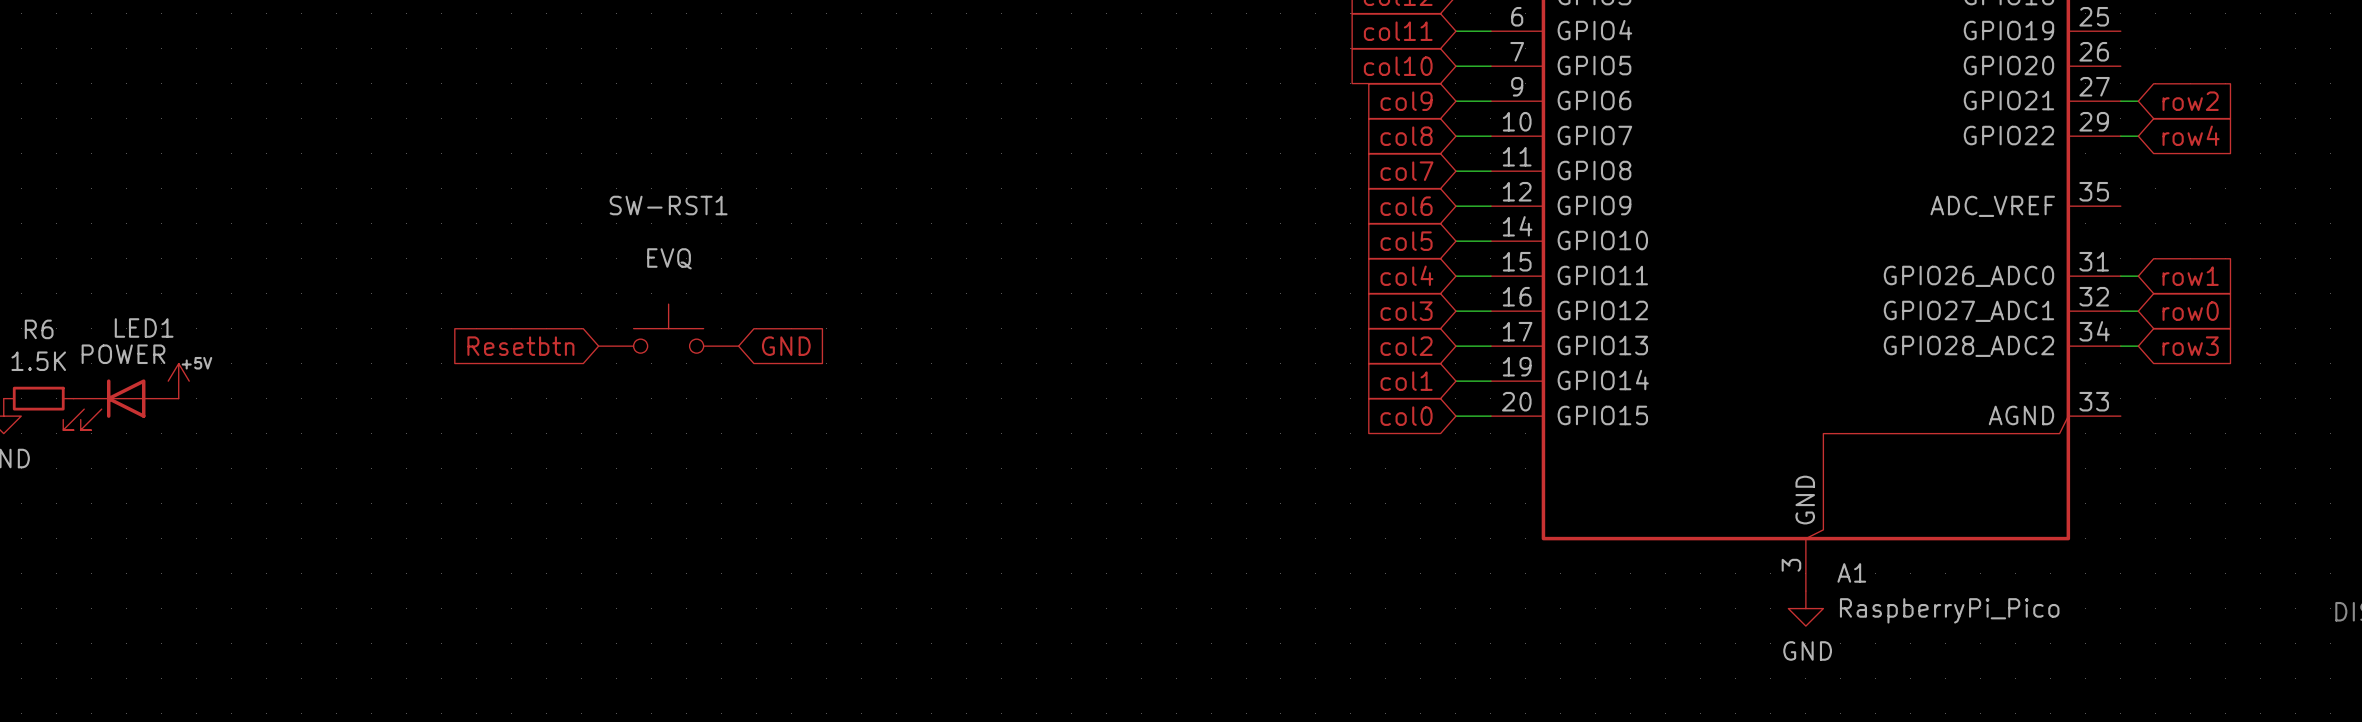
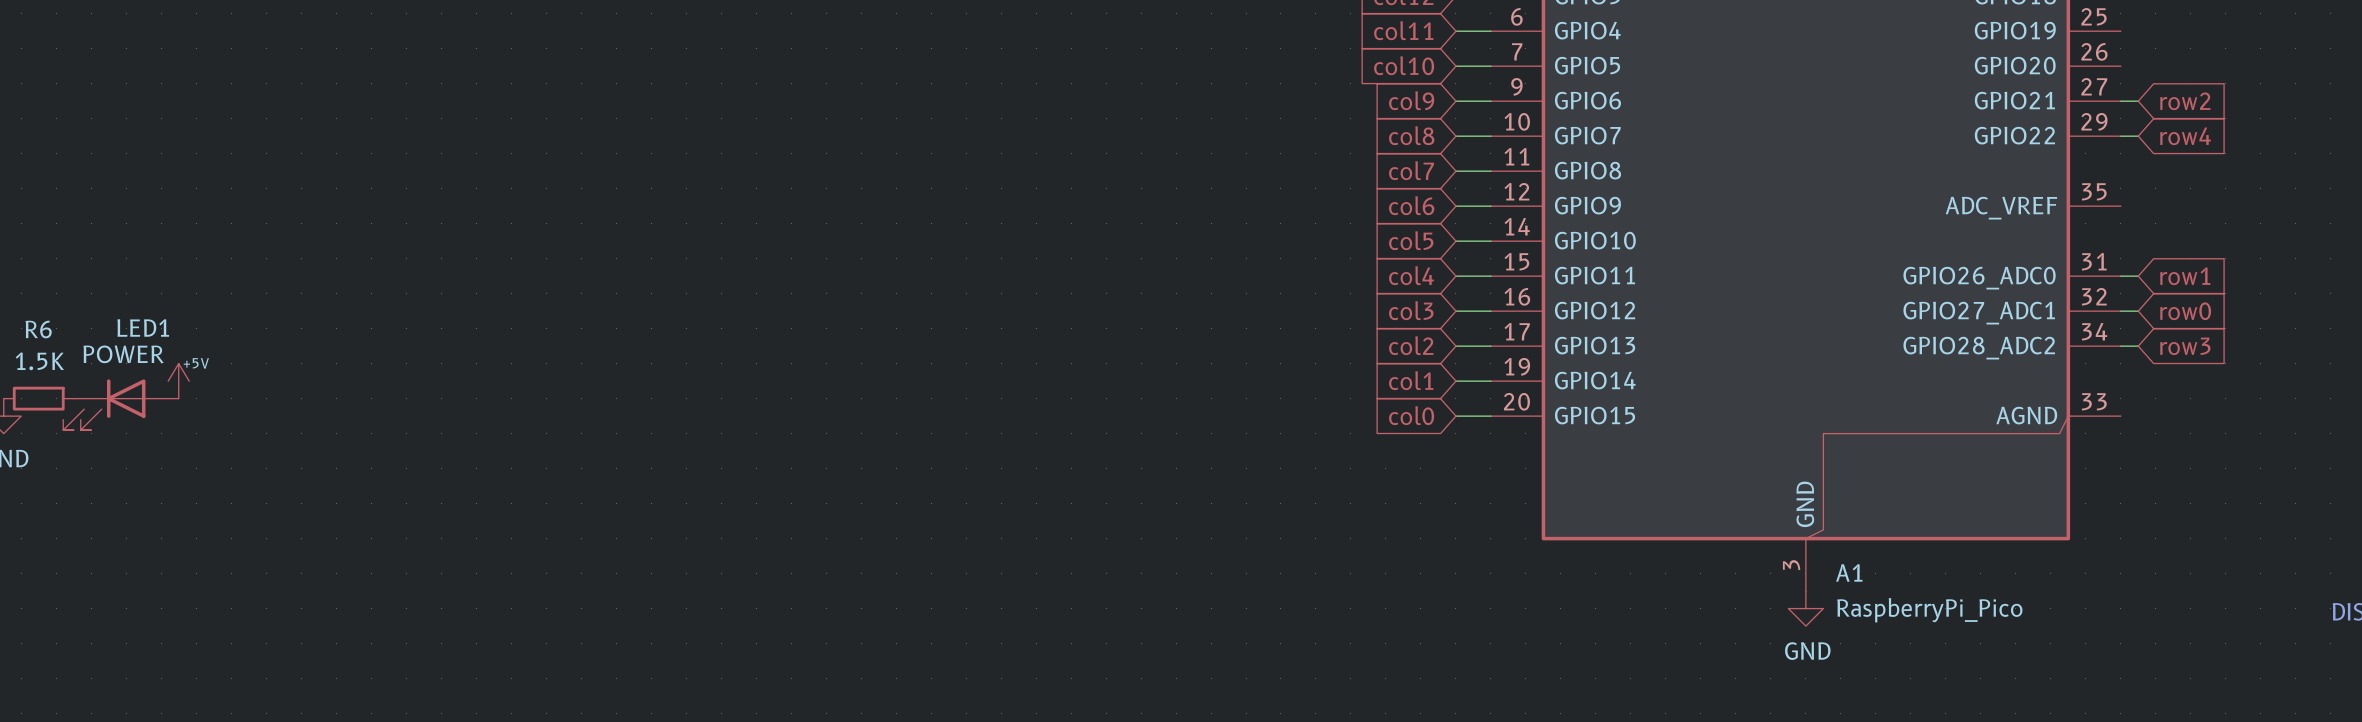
SW-RST1: EVQ (668, 328) -> none
global label: Resetbtn (520, 346) -> none
global label: GND (786, 346) -> none

